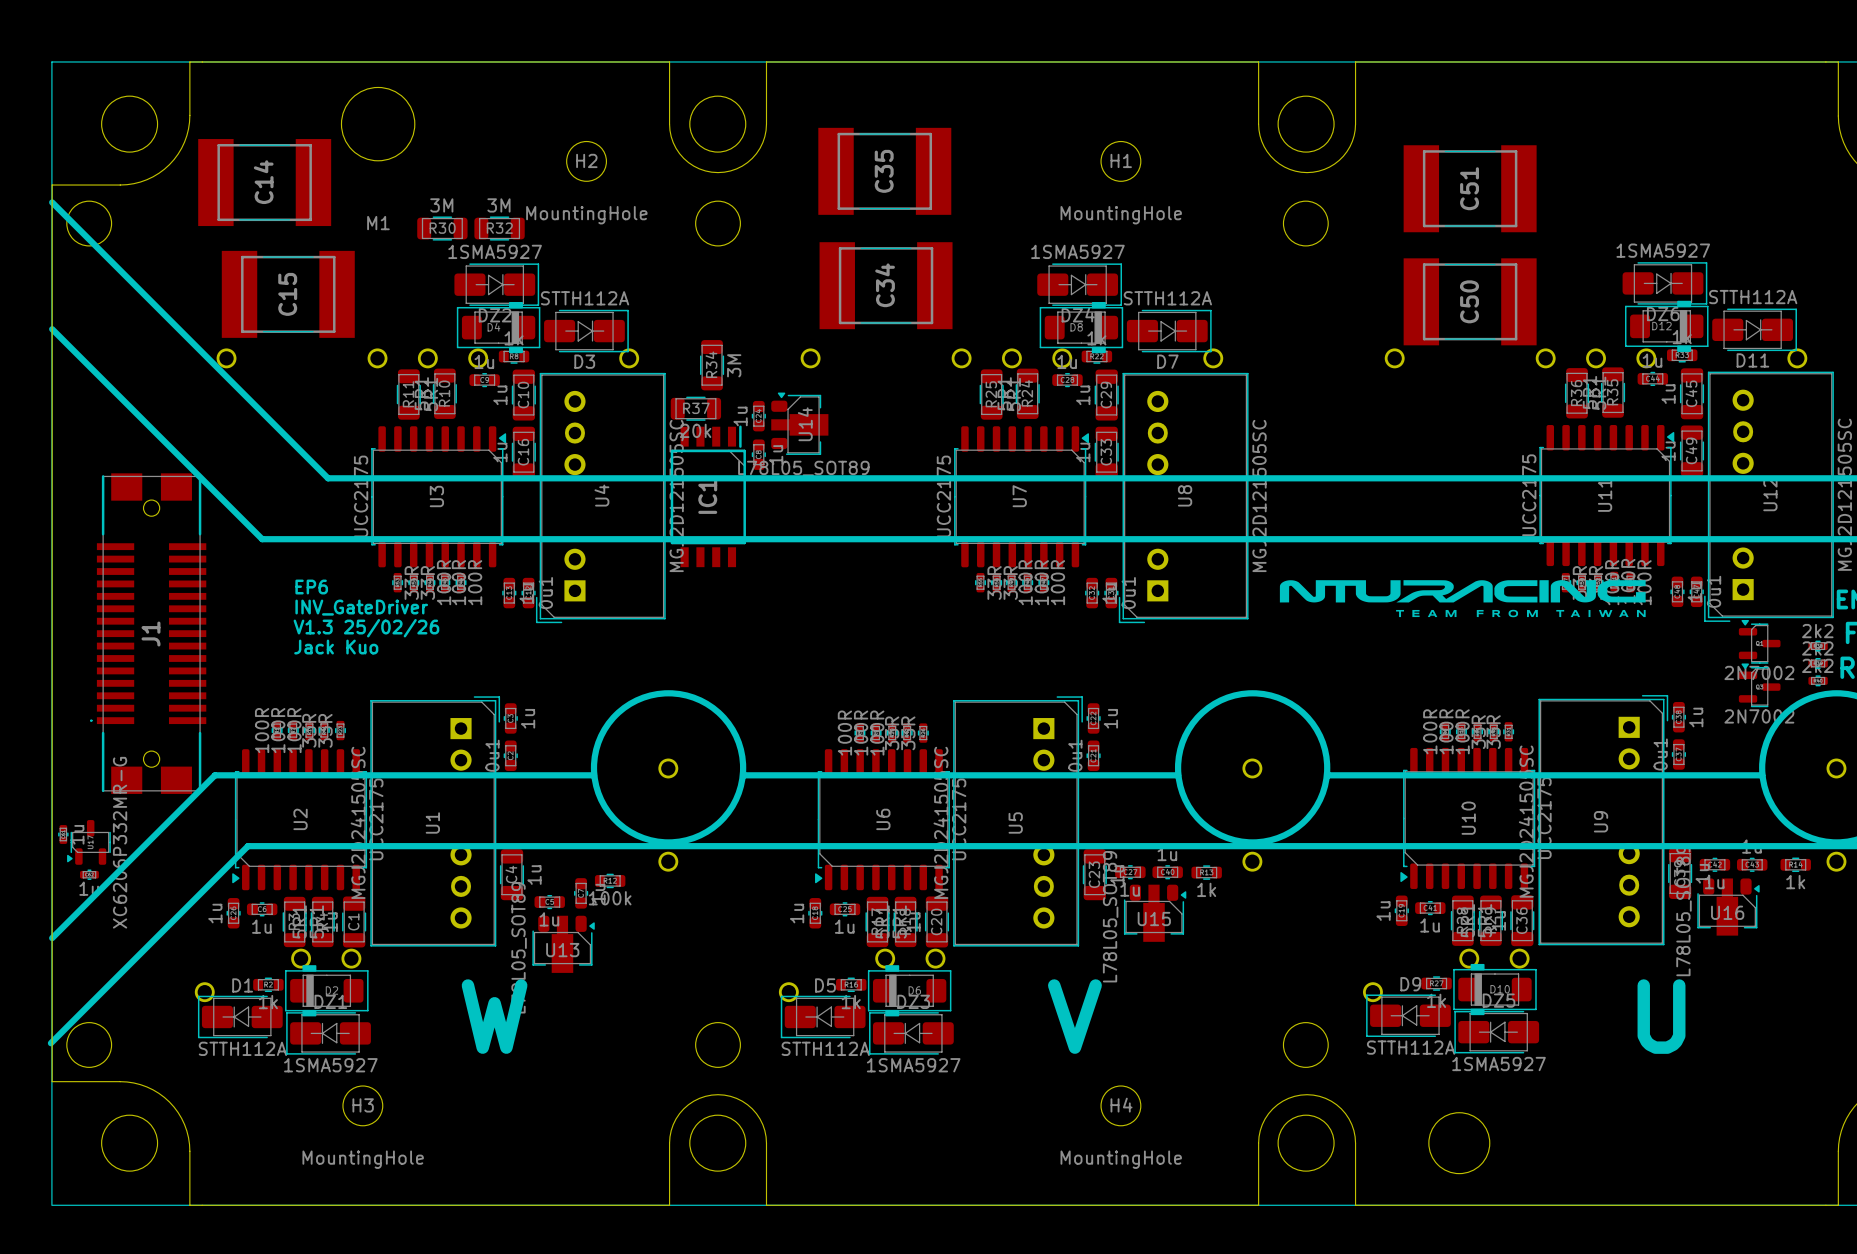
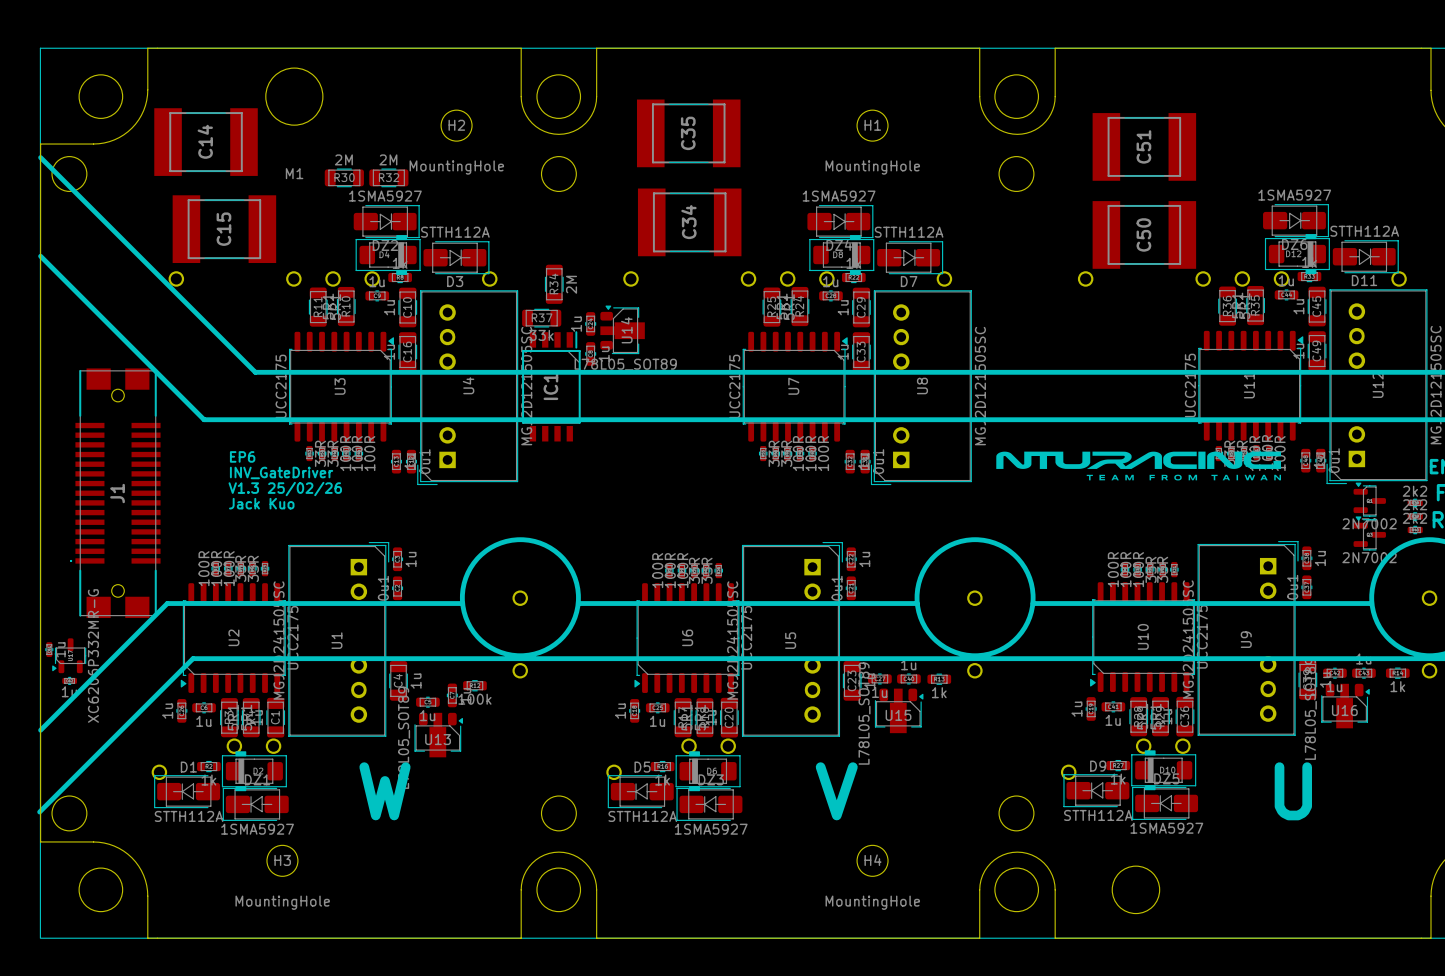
R30 value: 3M (441, 205) -> 2M (343, 159)
R32 value: 3M (498, 205) -> 2M (388, 159)
R34 value: 3M (734, 365) -> 2M (571, 284)
R37 value: 20k (695, 430) -> 33k (541, 335)

